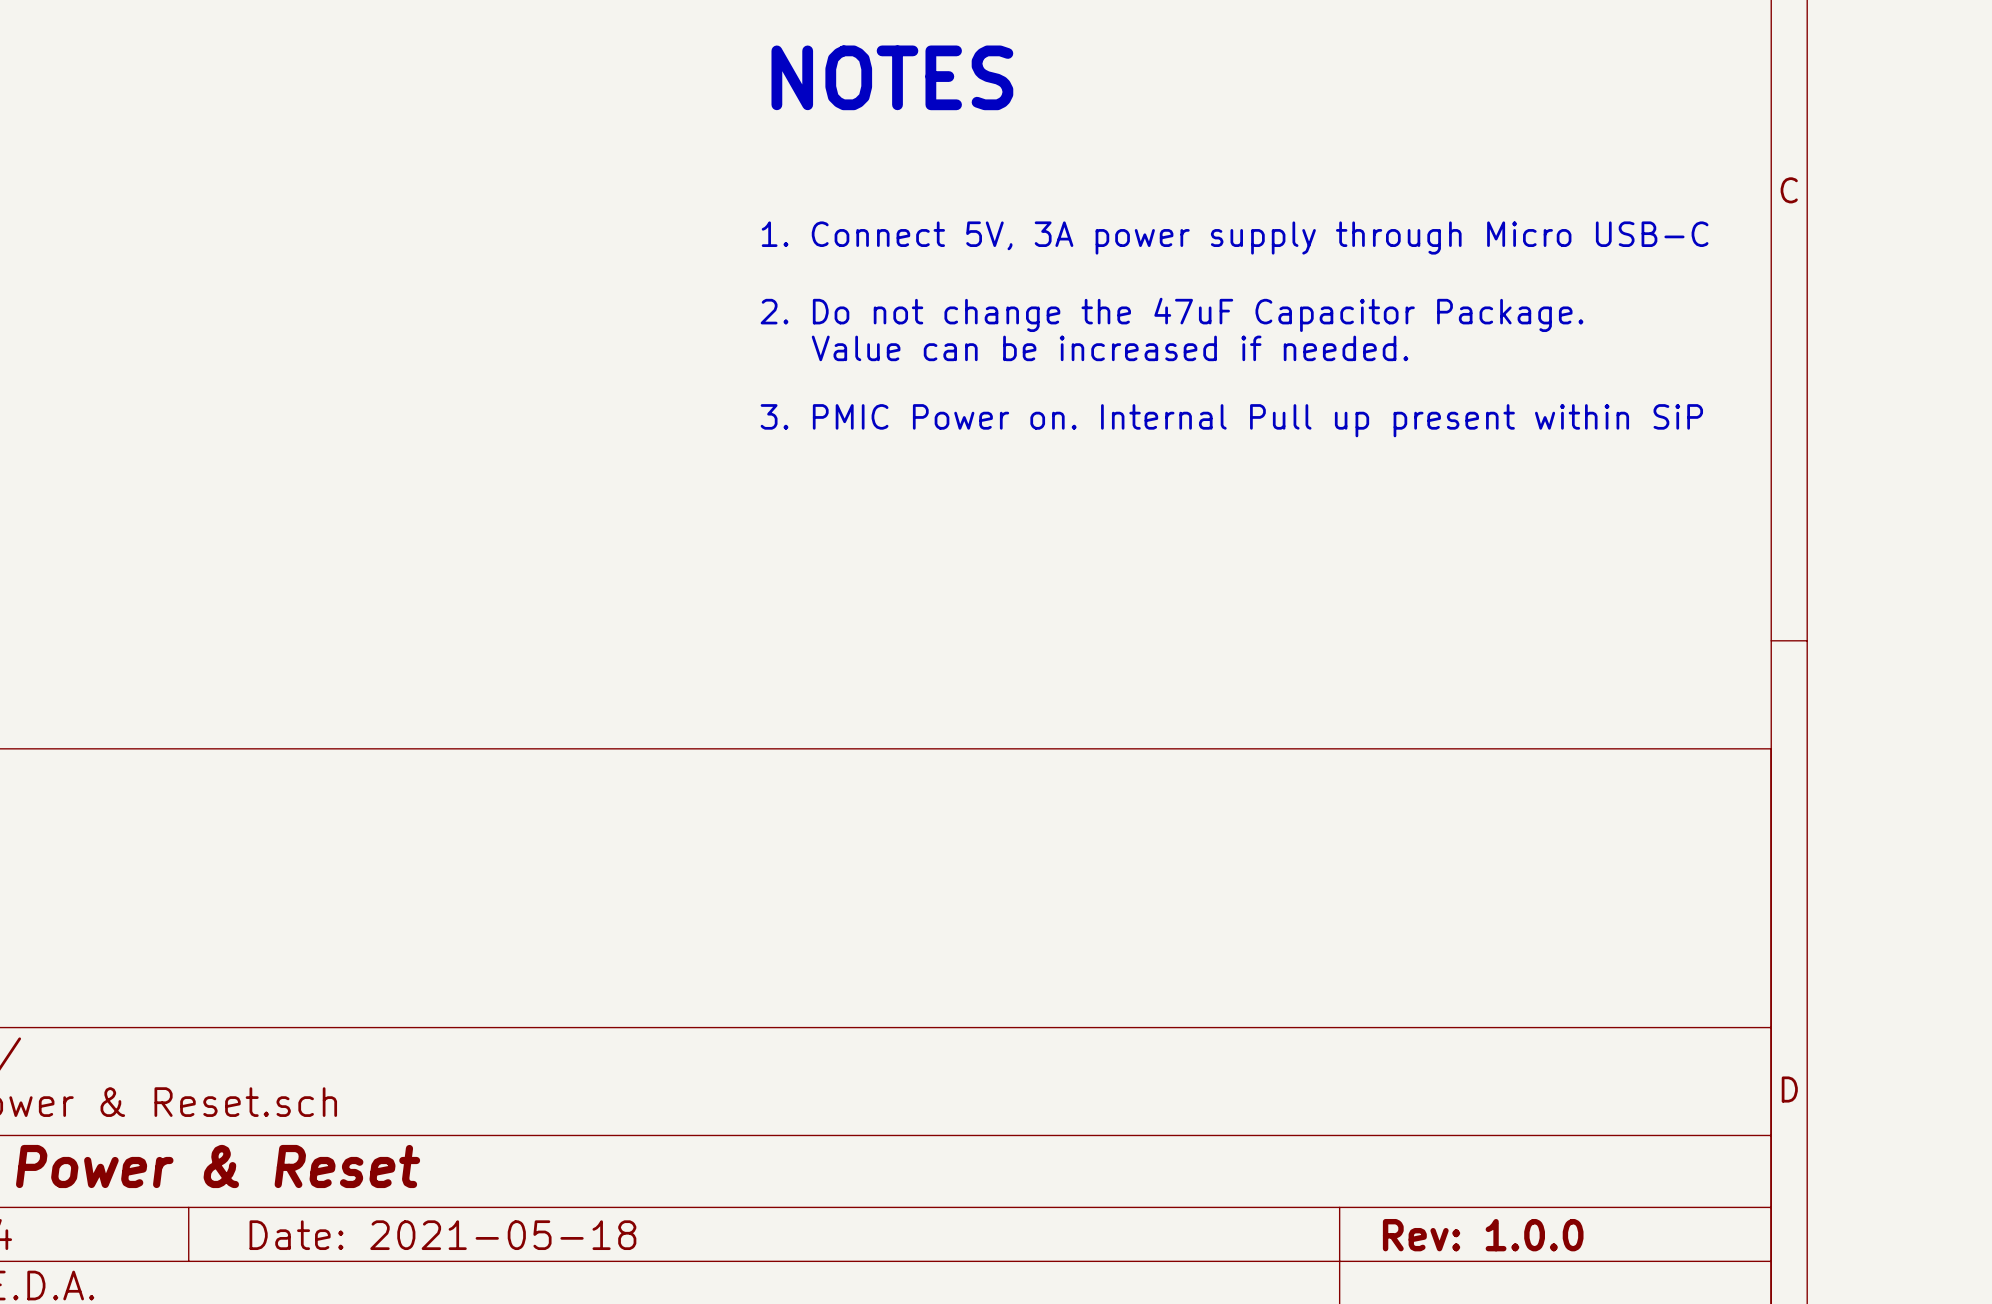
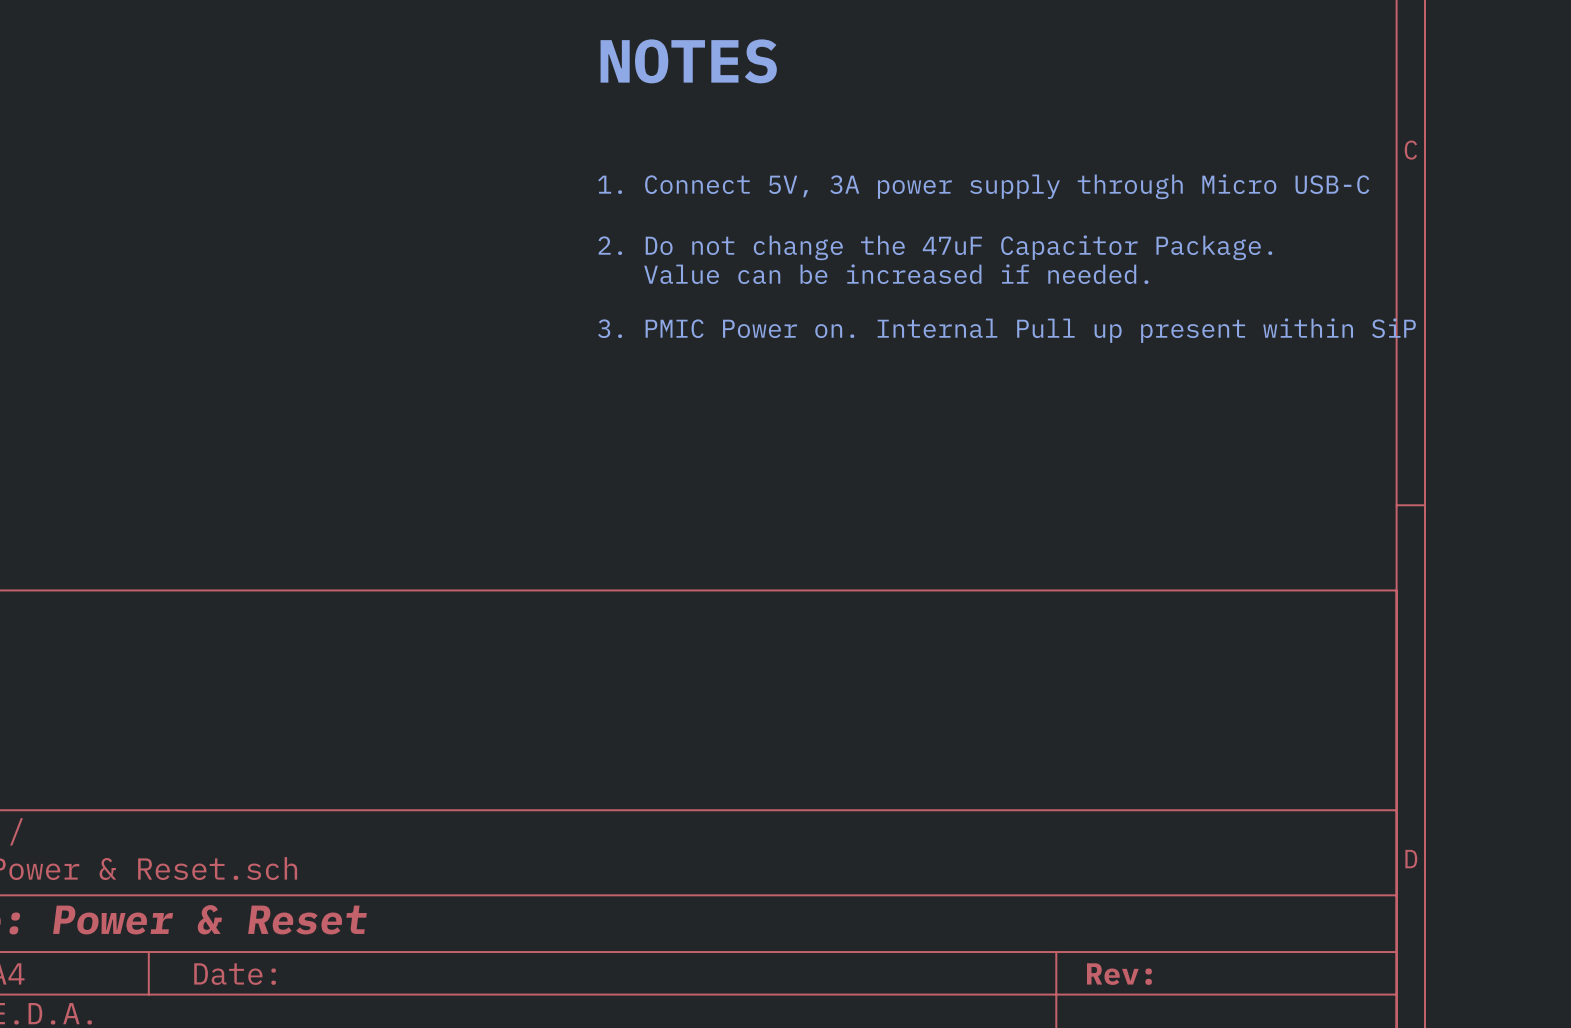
title block: Date: 2021-05-18 (442, 1235) -> Date: (235, 974)
title block: Rev: 1.0.0 (1483, 1235) -> Rev: (1119, 974)

